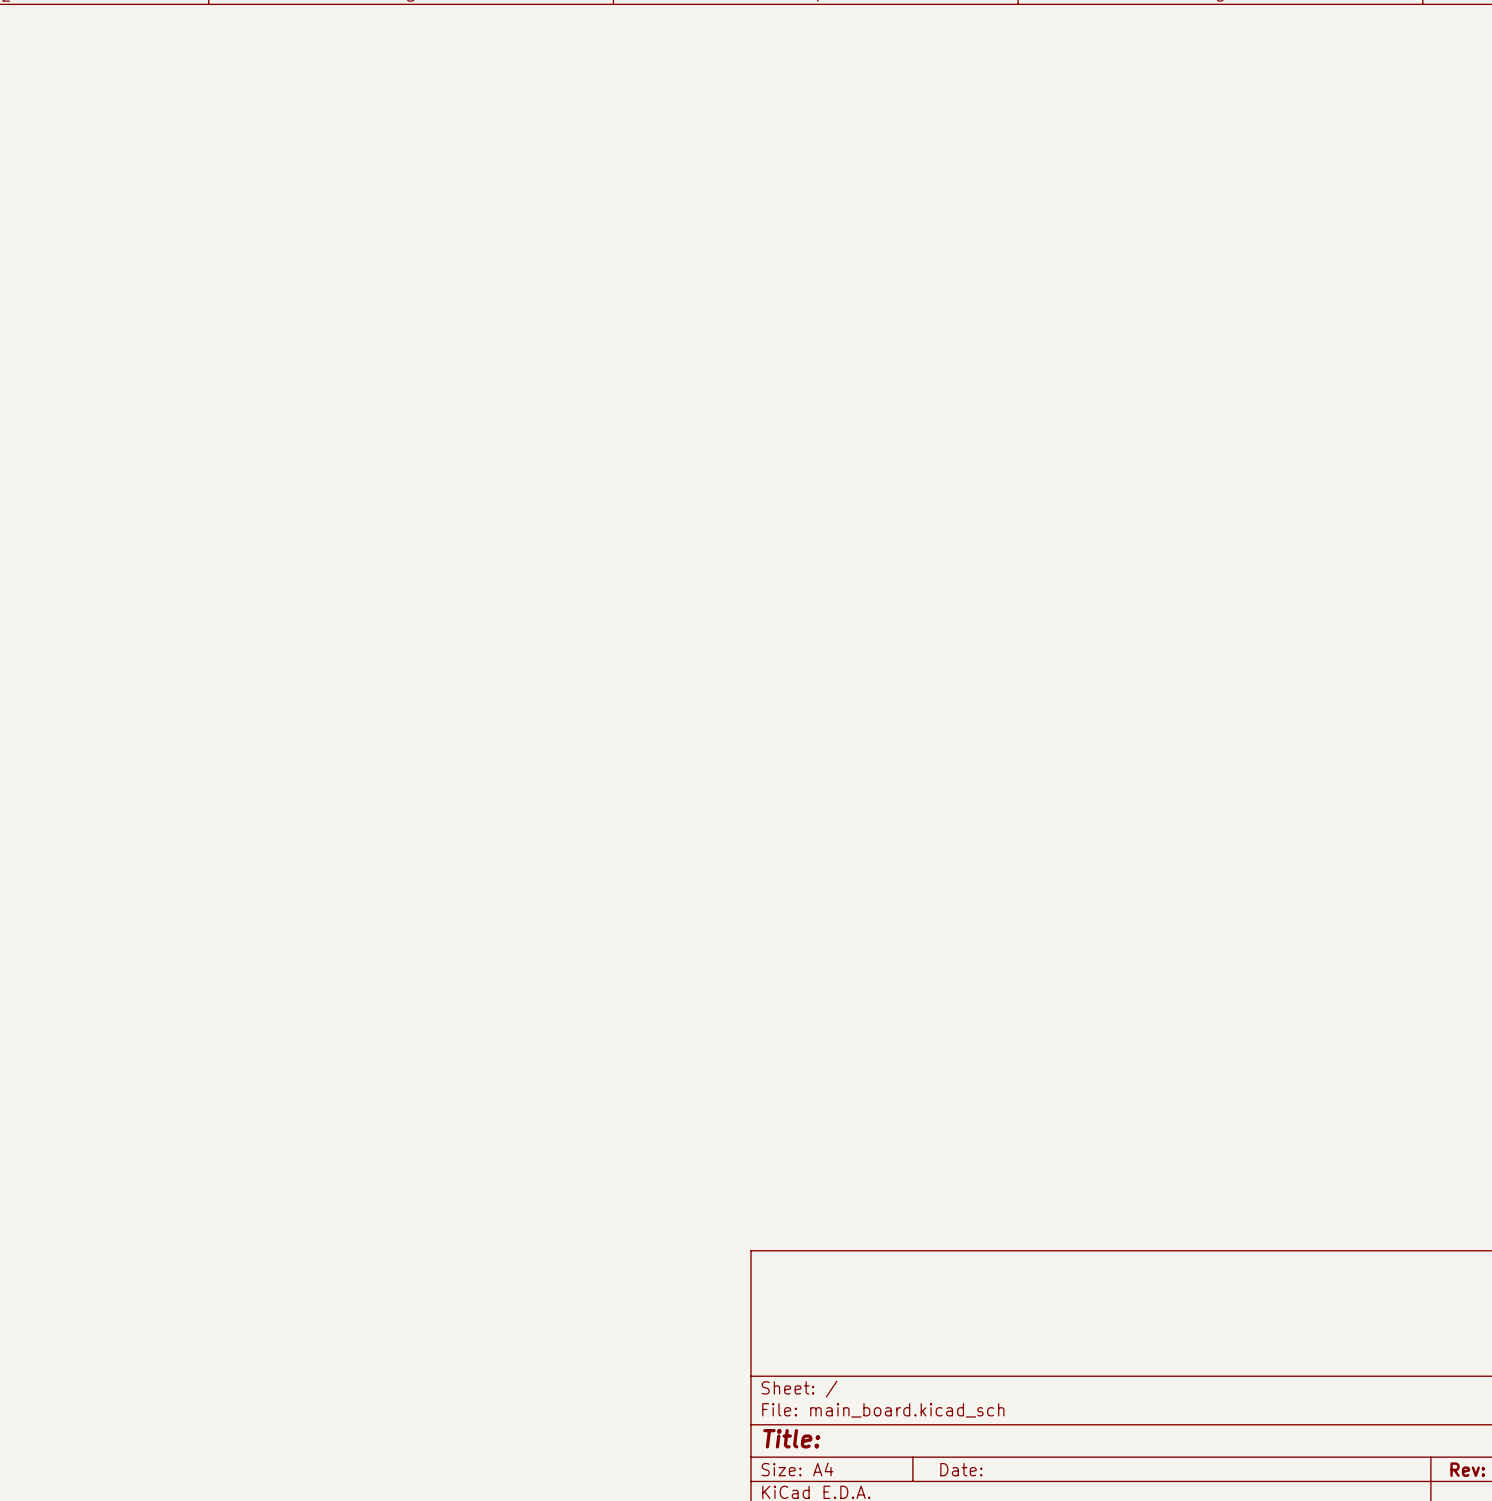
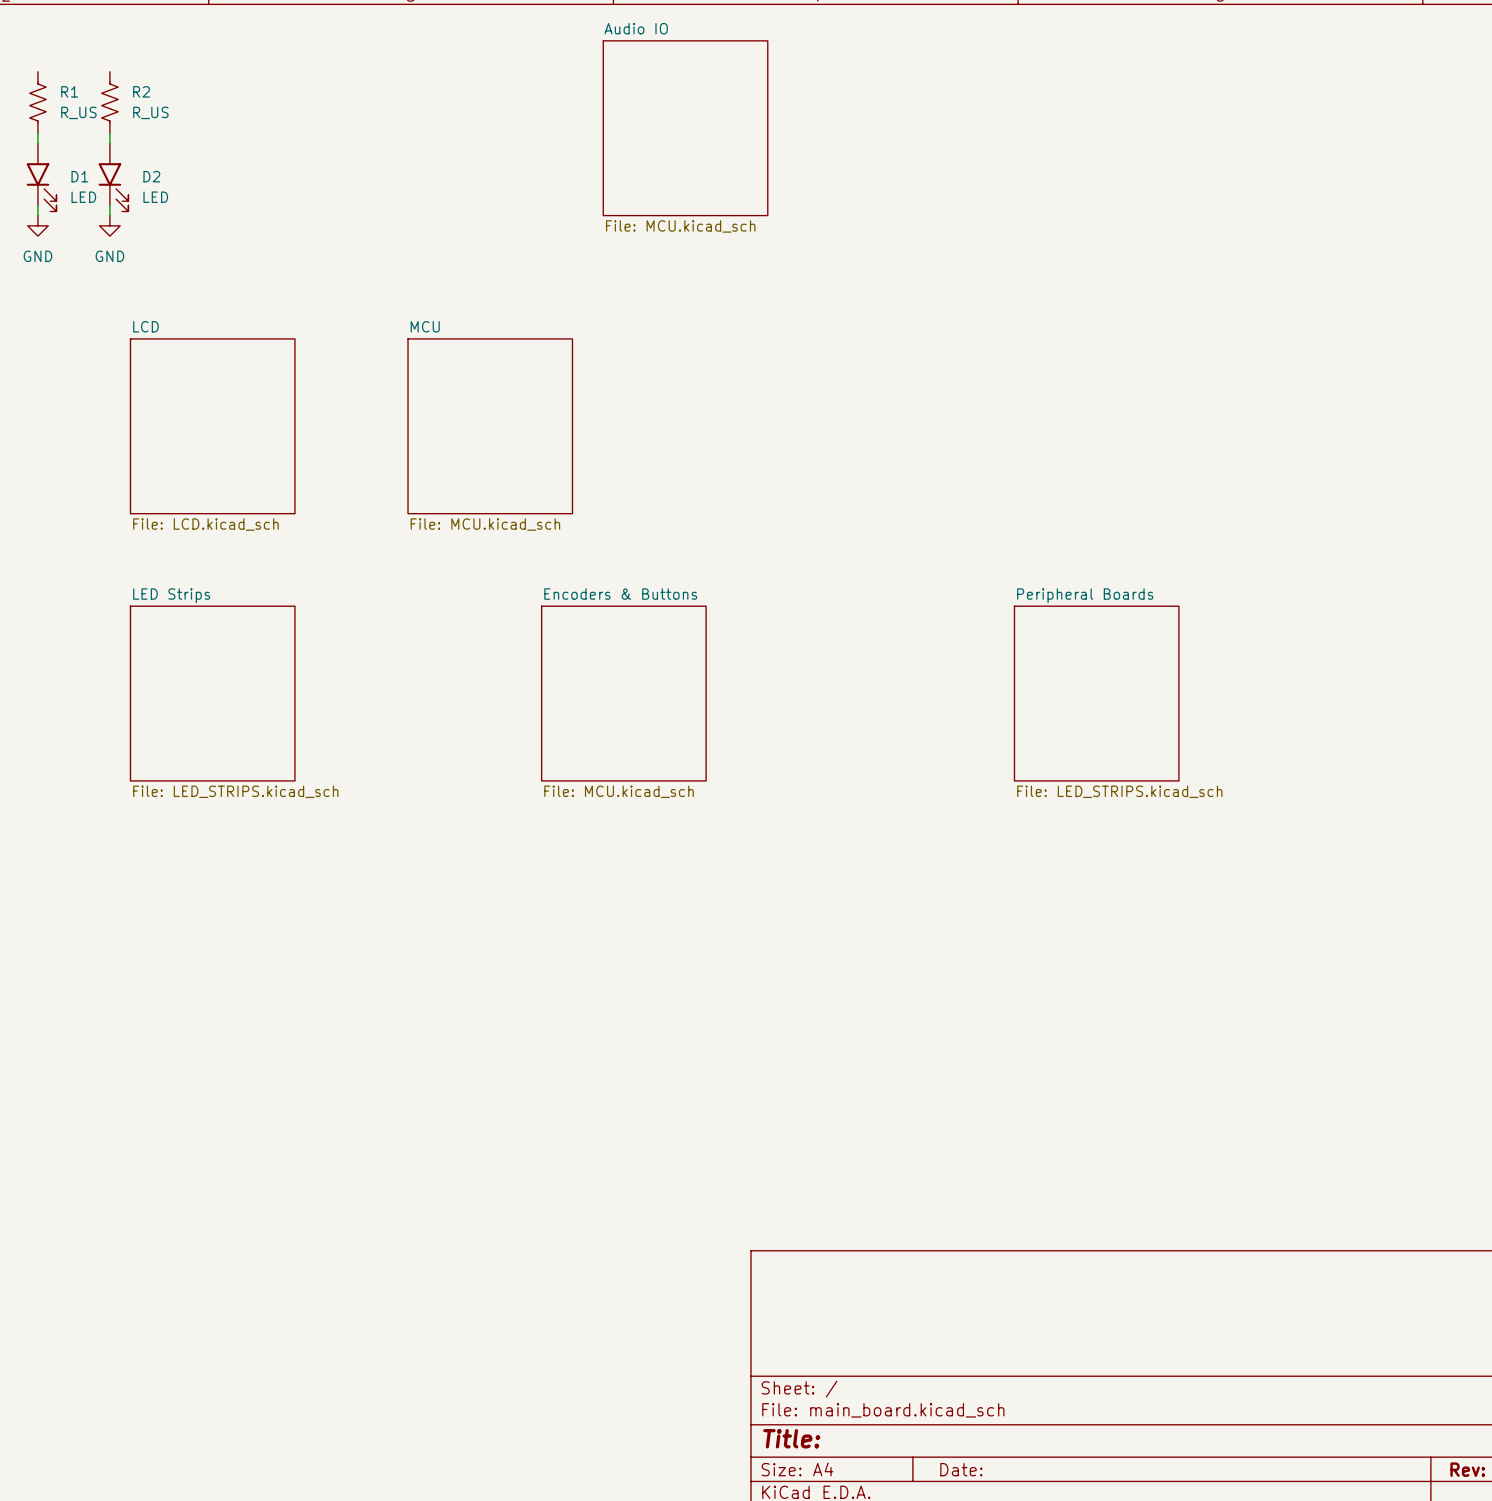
R1: none -> R_US (37, 102)
R2: none -> R_US (109, 102)
sheet Audio IO: none -> File: MCU.kicad_sch (685, 128)
wire: none -> (37, 133) (37, 143)
wire: none -> (109, 133) (109, 143)
D1: none -> LED (41, 177)
D2: none -> LED (113, 177)
wire: none -> (37, 205) (37, 215)
wire: none -> (109, 205) (109, 215)
power symbol: none -> GND (37, 225)
power symbol: none -> GND (109, 225)
sheet LCD: none -> File: LCD.kicad_sch (212, 426)
sheet MCU: none -> File: MCU.kicad_sch (490, 426)
sheet LED Strips: none -> File: LED_STRIPS.kicad_sch (212, 693)
sheet Encoders & Buttons: none -> File: MCU.kicad_sch (623, 693)
sheet Peripheral Boards: none -> File: LED_STRIPS.kicad_sch (1096, 693)

